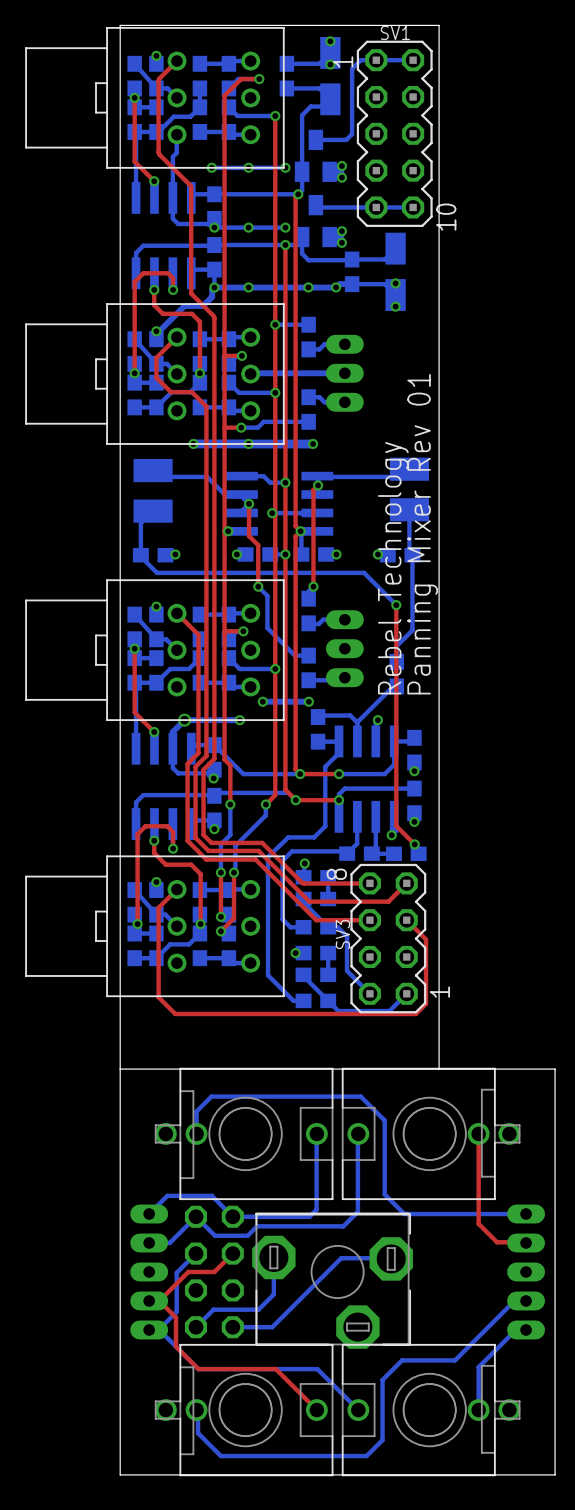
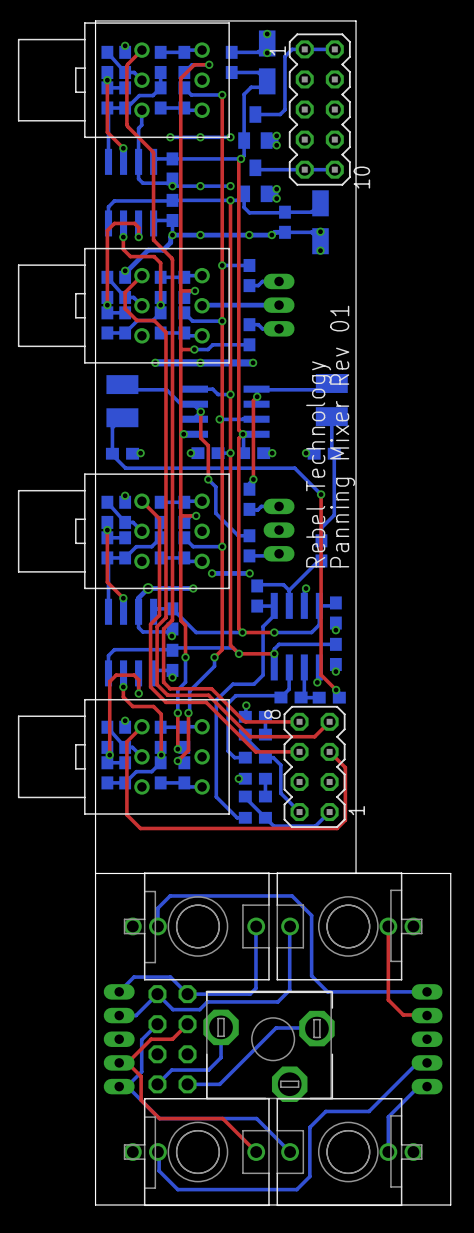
SV1 name: SV1 (395, 32) -> none
SV3 name: SV3 (342, 934) -> none

